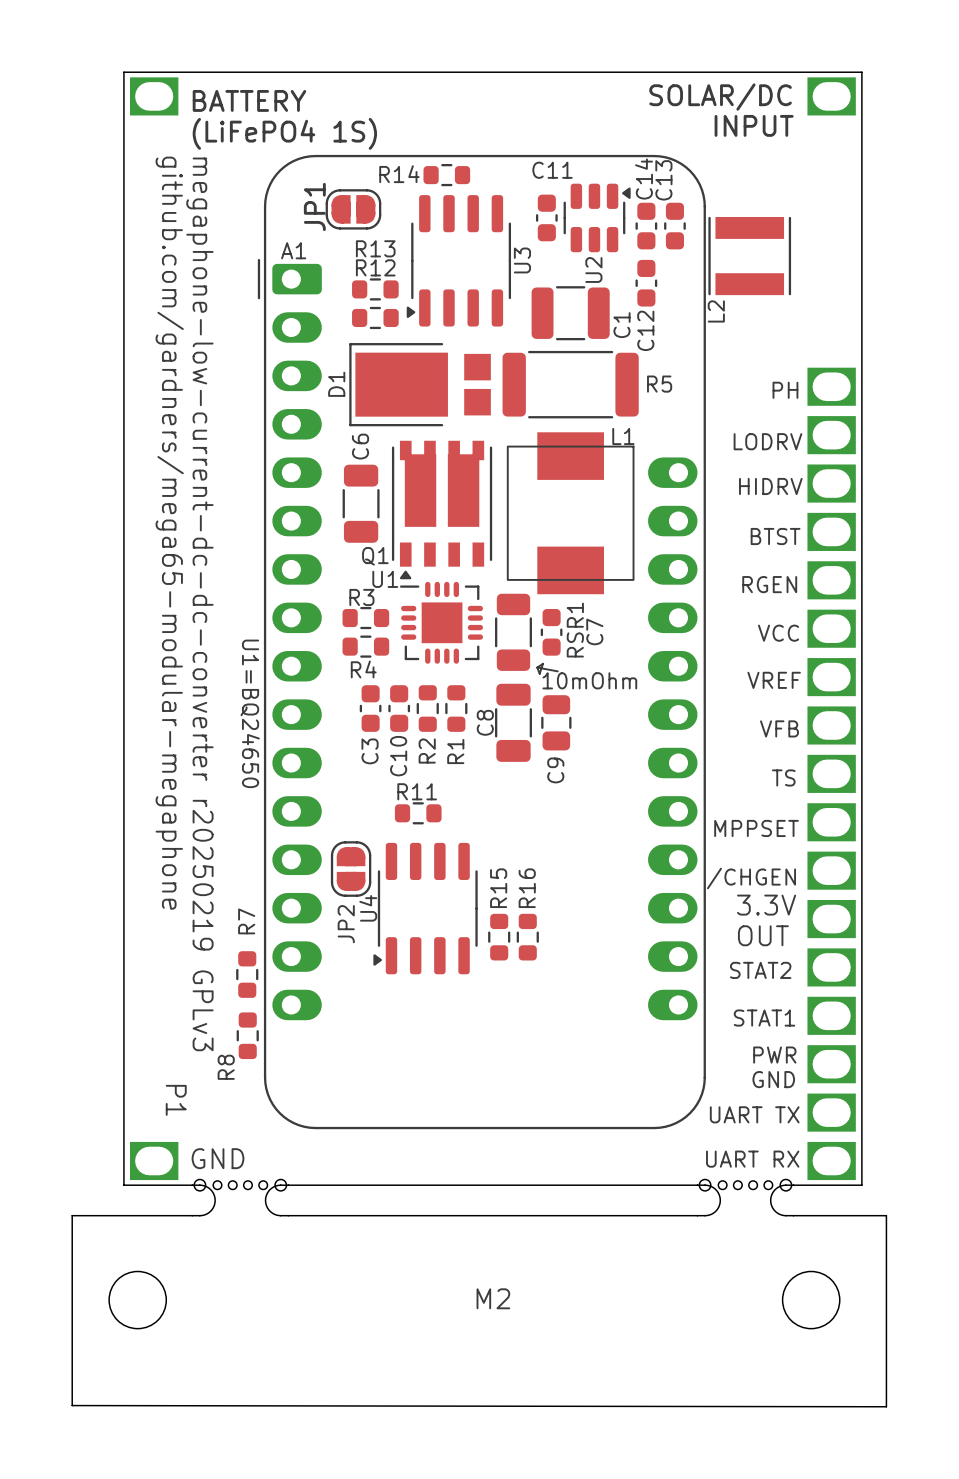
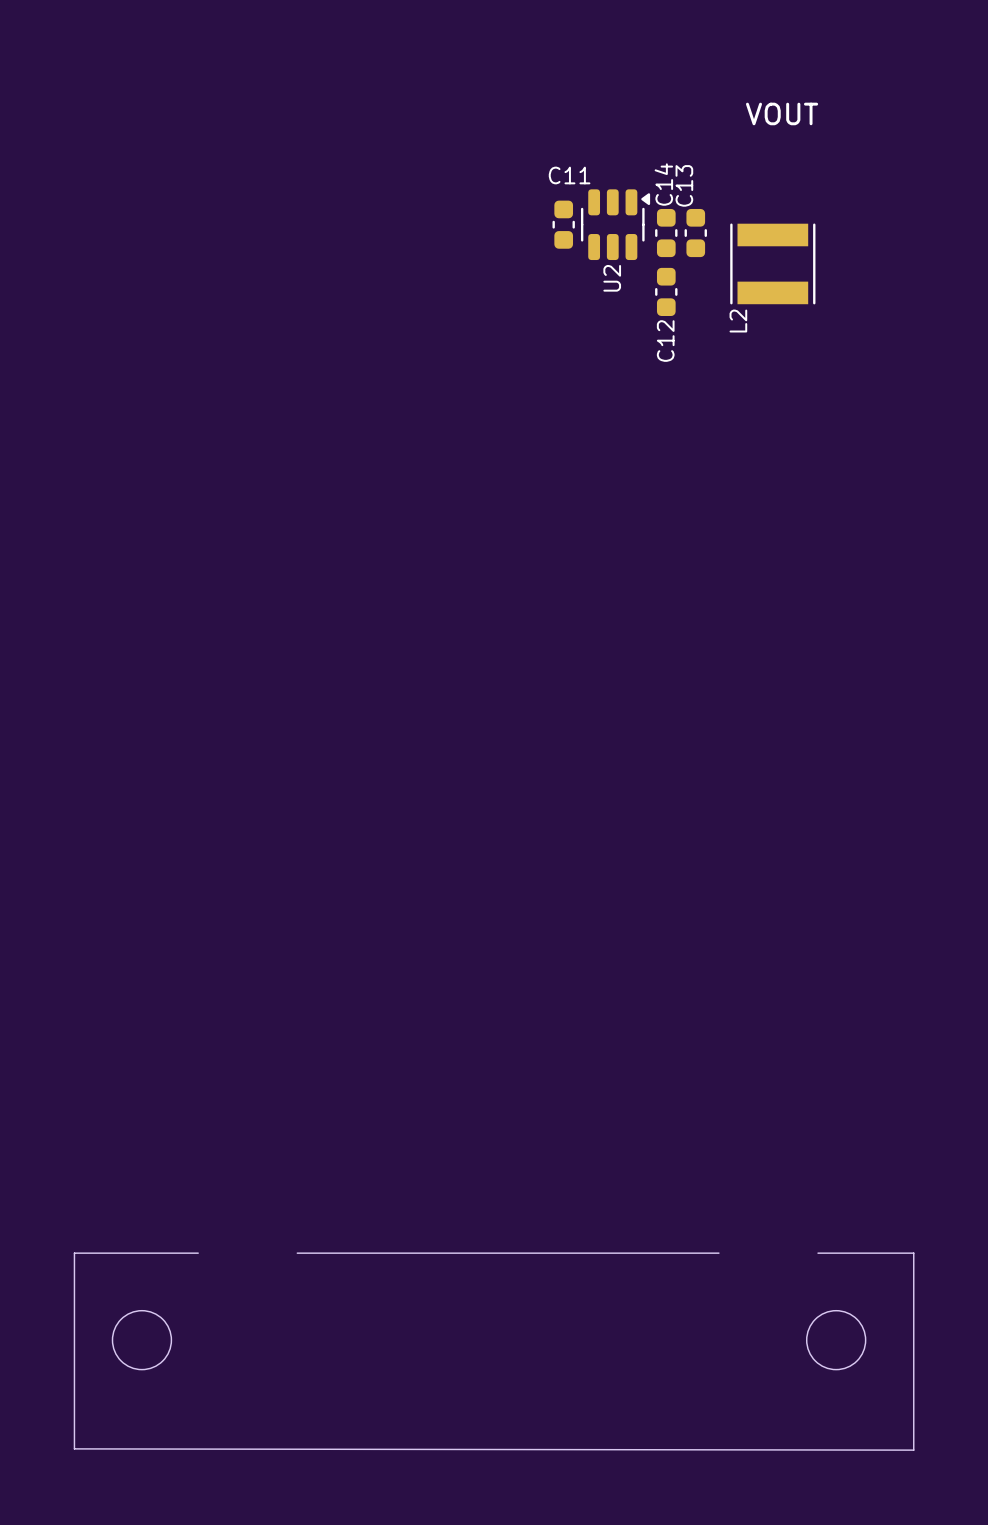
text: SOLAR/DC (720, 97) -> none
text: BATTERY (249, 100) -> none
text: none -> VOUT (782, 113)
text: INPUT (754, 125) -> none
text: (LiFePO4 1S) (284, 133) -> none
R14: (446, 175) -> none
JP1: (353, 209) -> none
U3: (458, 260) -> none
R13: (375, 289) -> none
C1: (570, 313) -> none
R12: (375, 317) -> none
D1: (420, 384) -> none
R5: (570, 384) -> none
text: PH (785, 390) -> none
text: LODRV (767, 441) -> none
text: HIDRV (770, 486) -> none
C6: (361, 503) -> none
Q1: (442, 510) -> none
L1: (570, 513) -> none
text: github.com/gardners/mega65-modular-megaphone (169, 533) -> none
text: BTST (775, 536) -> none
text: RGEN (769, 584) -> none
text: megaphone-low-current-dc-dc-converter r20250219 GPLv3 (199, 604) -> none
R3: (365, 618) -> none
U1: (441, 622) -> none
RSR1: 10mOhm (513, 632) -> none
C7: (551, 632) -> none
text: VCC (778, 633) -> none
A1: (481, 642) -> none
M2: (492, 643) -> none
R4: (365, 646) -> none
line: (537, 667) (539, 673) (543, 663) (537, 667) -> none
line: (537, 667) (557, 671) -> none
text: VREF (774, 680) -> none
C3: (370, 708) -> none
C10: (399, 708) -> none
R2: (427, 708) -> none
R1: (456, 708) -> none
text: U1=BQ24650 (250, 713) -> none
C8: (513, 722) -> none
C9: (556, 722) -> none
text: VFB (779, 728) -> none
text: TS (783, 777) -> none
R11: (418, 813) -> none
text: MPPSET (756, 828) -> none
JP2: (351, 869) -> none
text: /CHGEN (751, 878) -> none
text: 3.3V (766, 905) -> none
U4: (425, 908) -> none
text: OUT (763, 935) -> none
R15: (499, 937) -> none
R16: (527, 937) -> none
text: STAT2 (760, 970) -> none
R7: (247, 974) -> none
text: STAT1 (764, 1018) -> none
R8: (247, 1035) -> none
text: PWR (774, 1055) -> none
text: GND (773, 1079) -> none
text: P1 (176, 1100) -> none
text: UART TX (754, 1114) -> none
text: GND (218, 1158) -> none
text: UART RX (752, 1159) -> none

